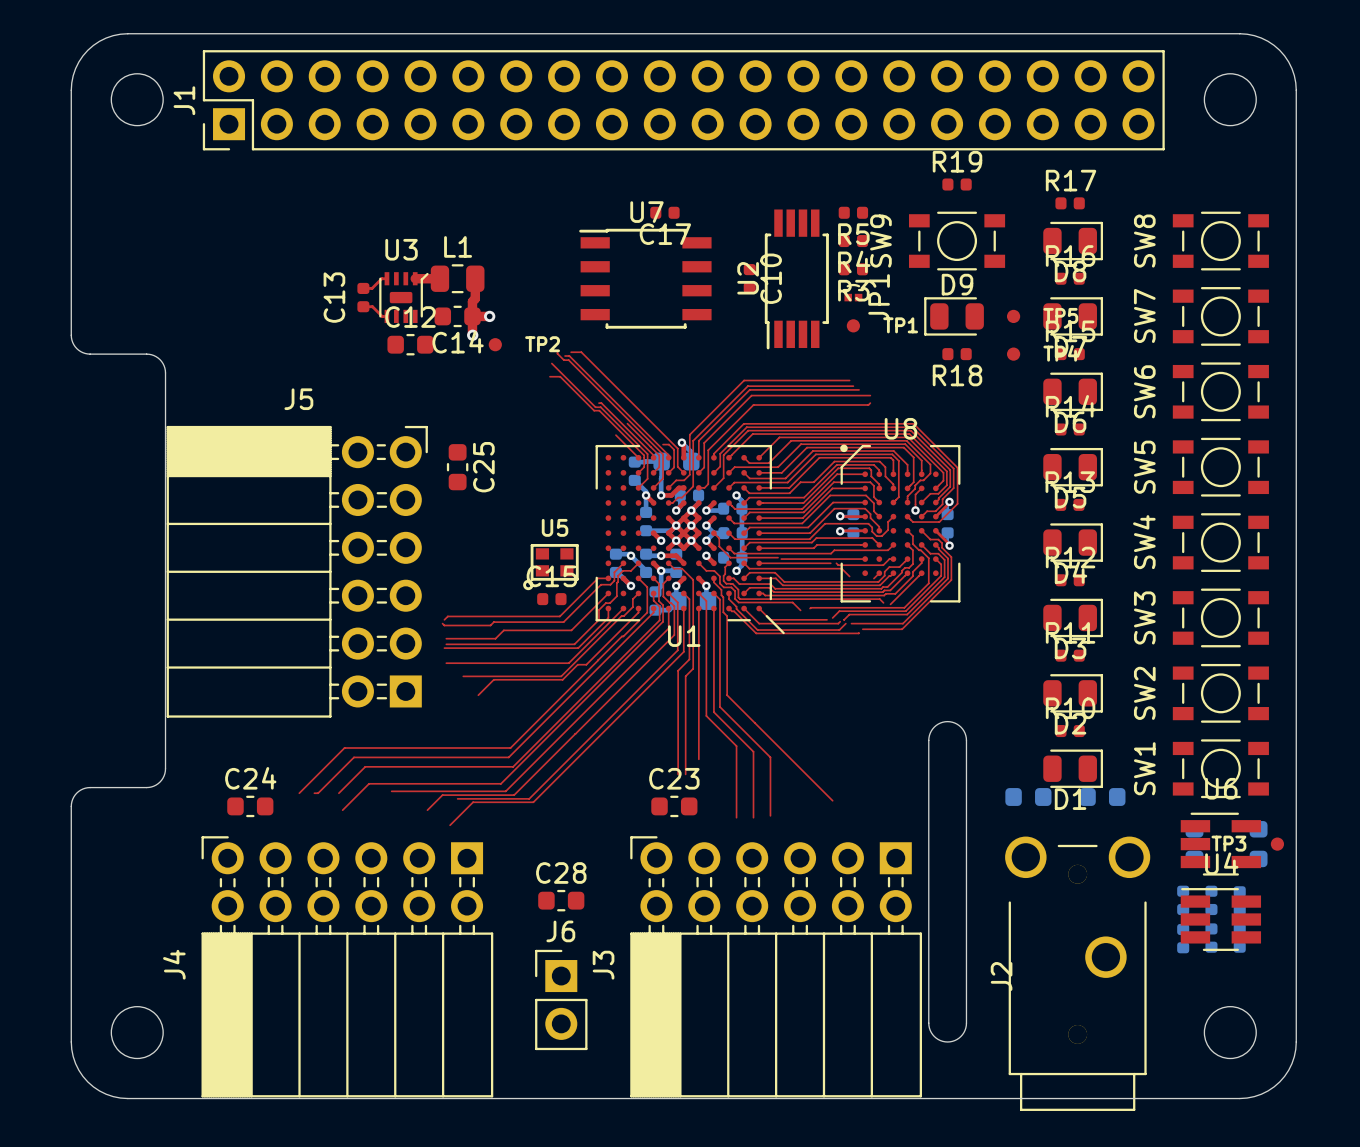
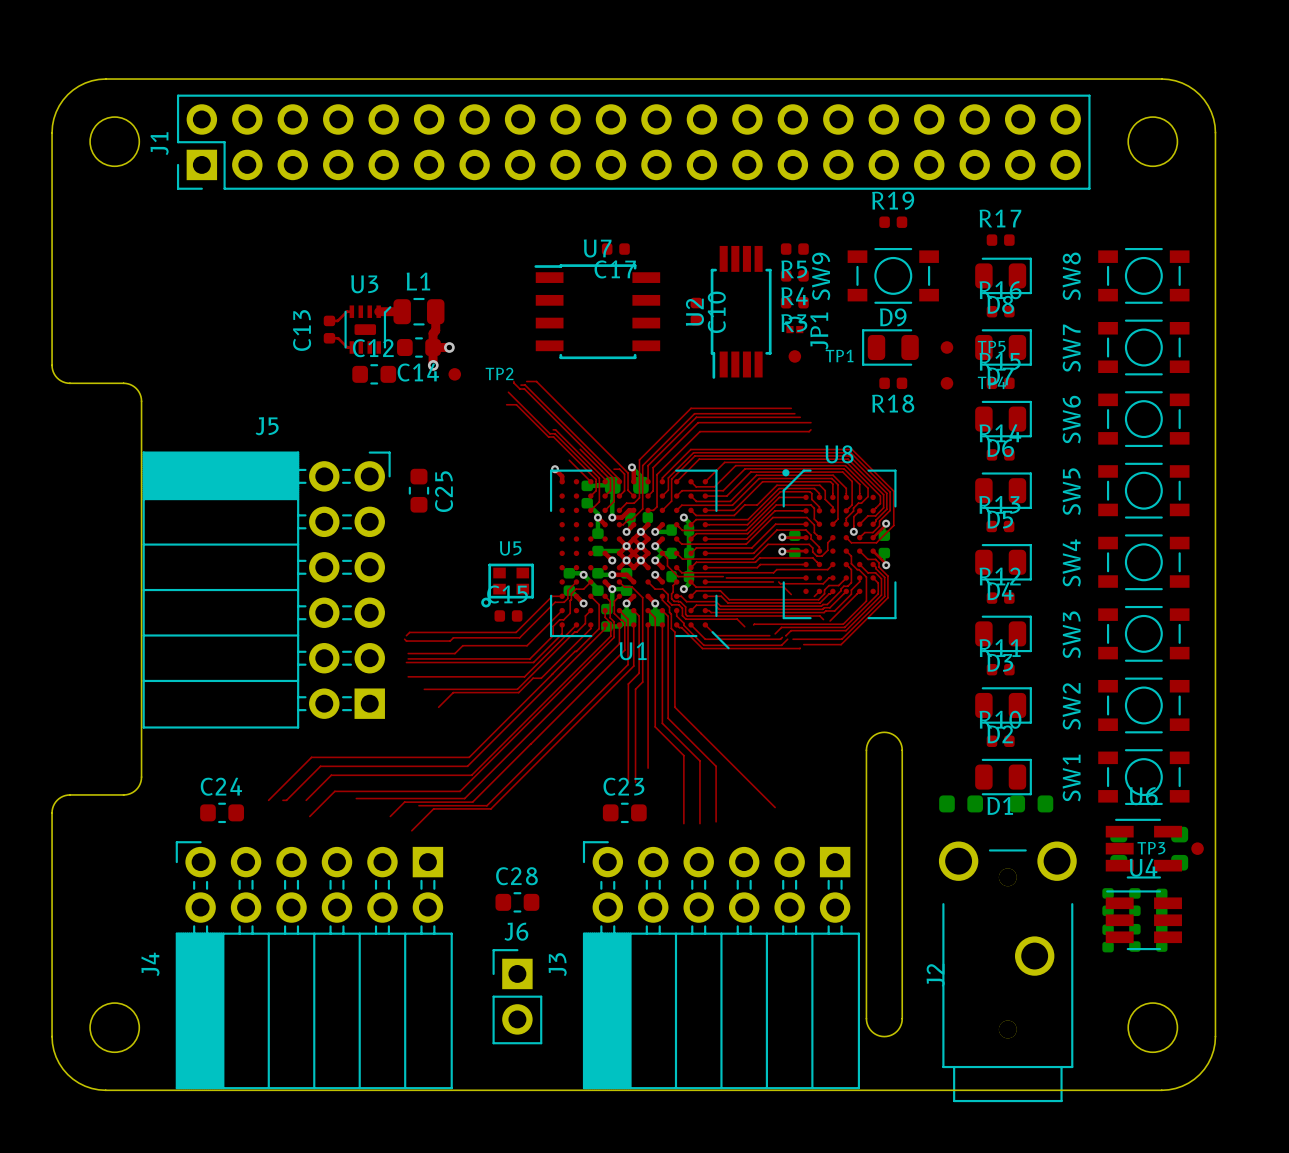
top track: none -> (555, 469) (562, 476) (562, 481)
via: none -> (555, 469)

